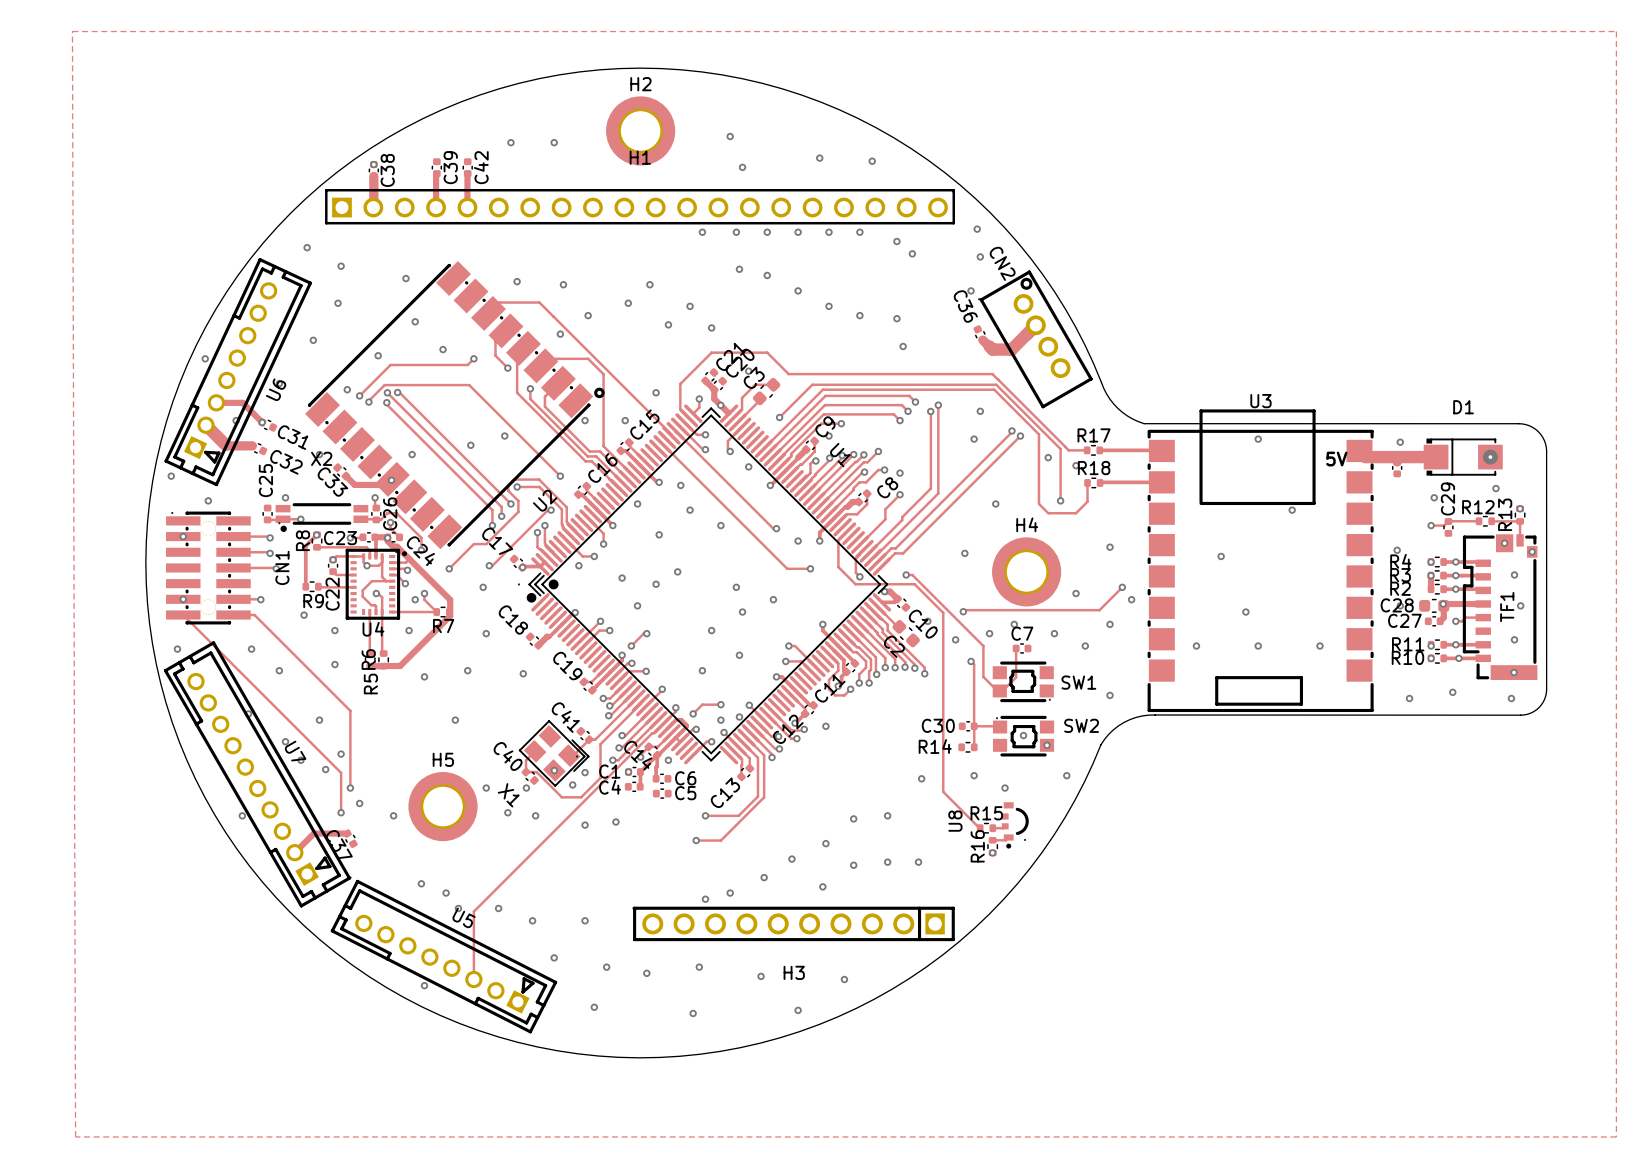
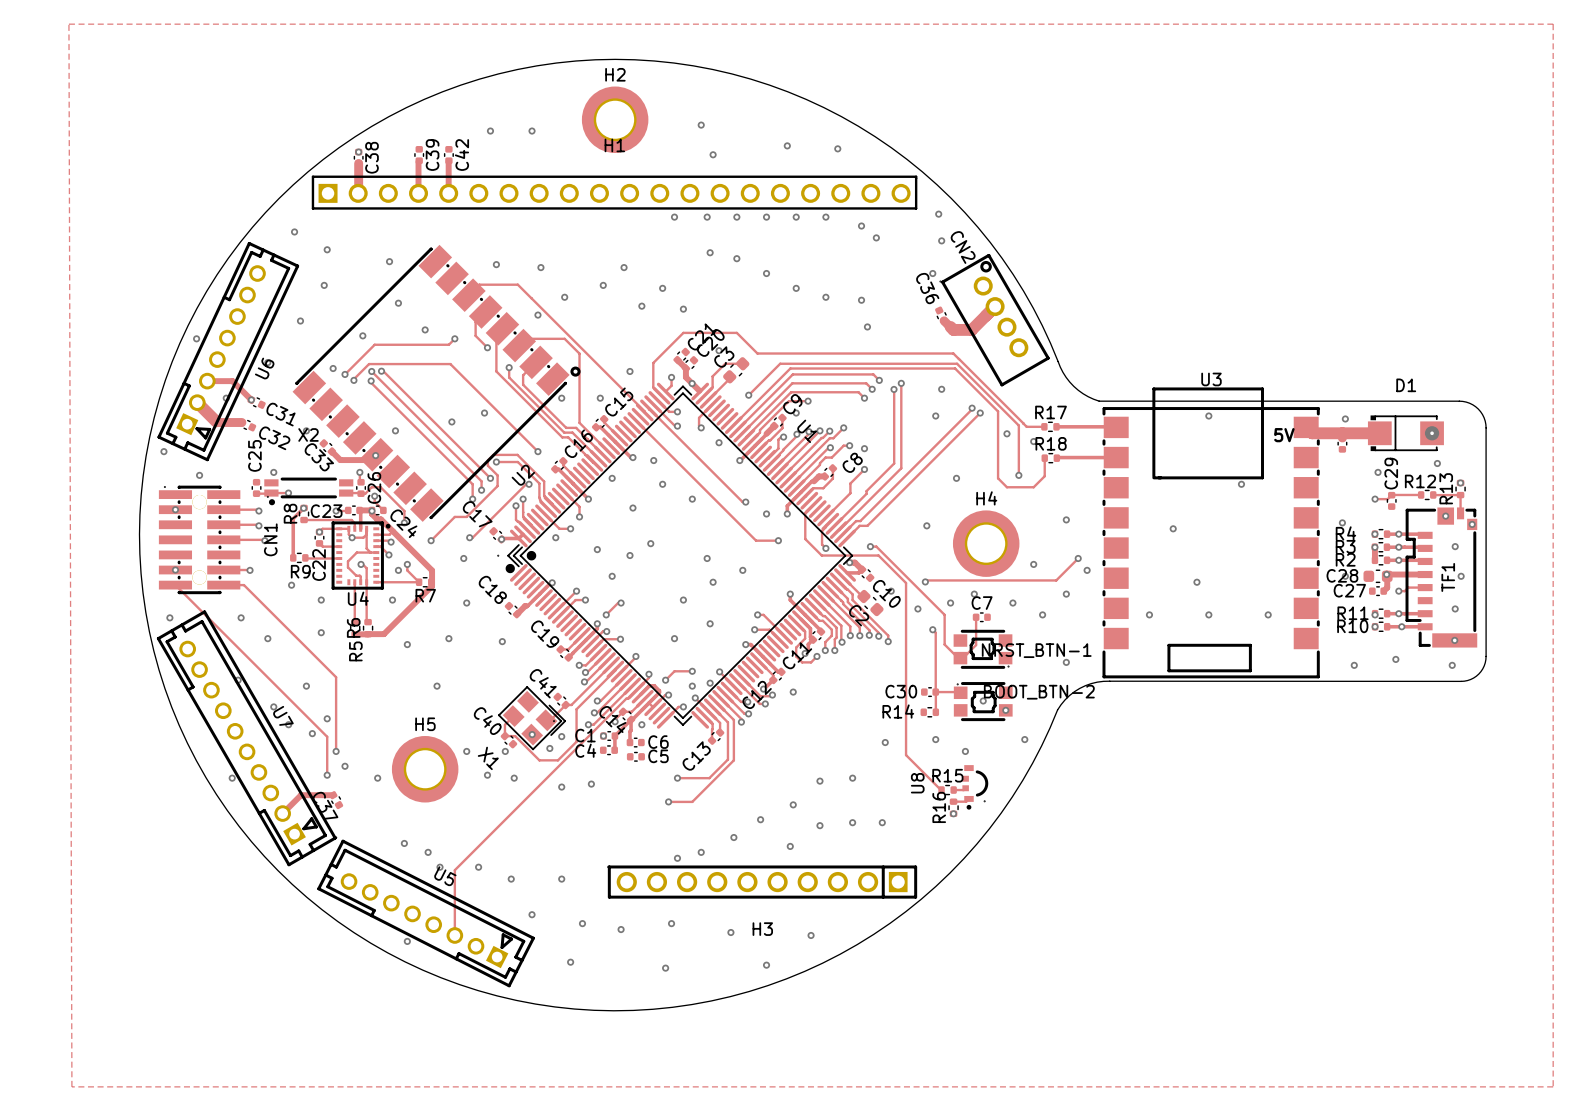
SW1 name: SW1 (1078, 682) -> NRST_BTN-1 (1036, 650)
SW2 name: SW2 (1081, 725) -> BOOT_BTN-2 (1039, 692)

